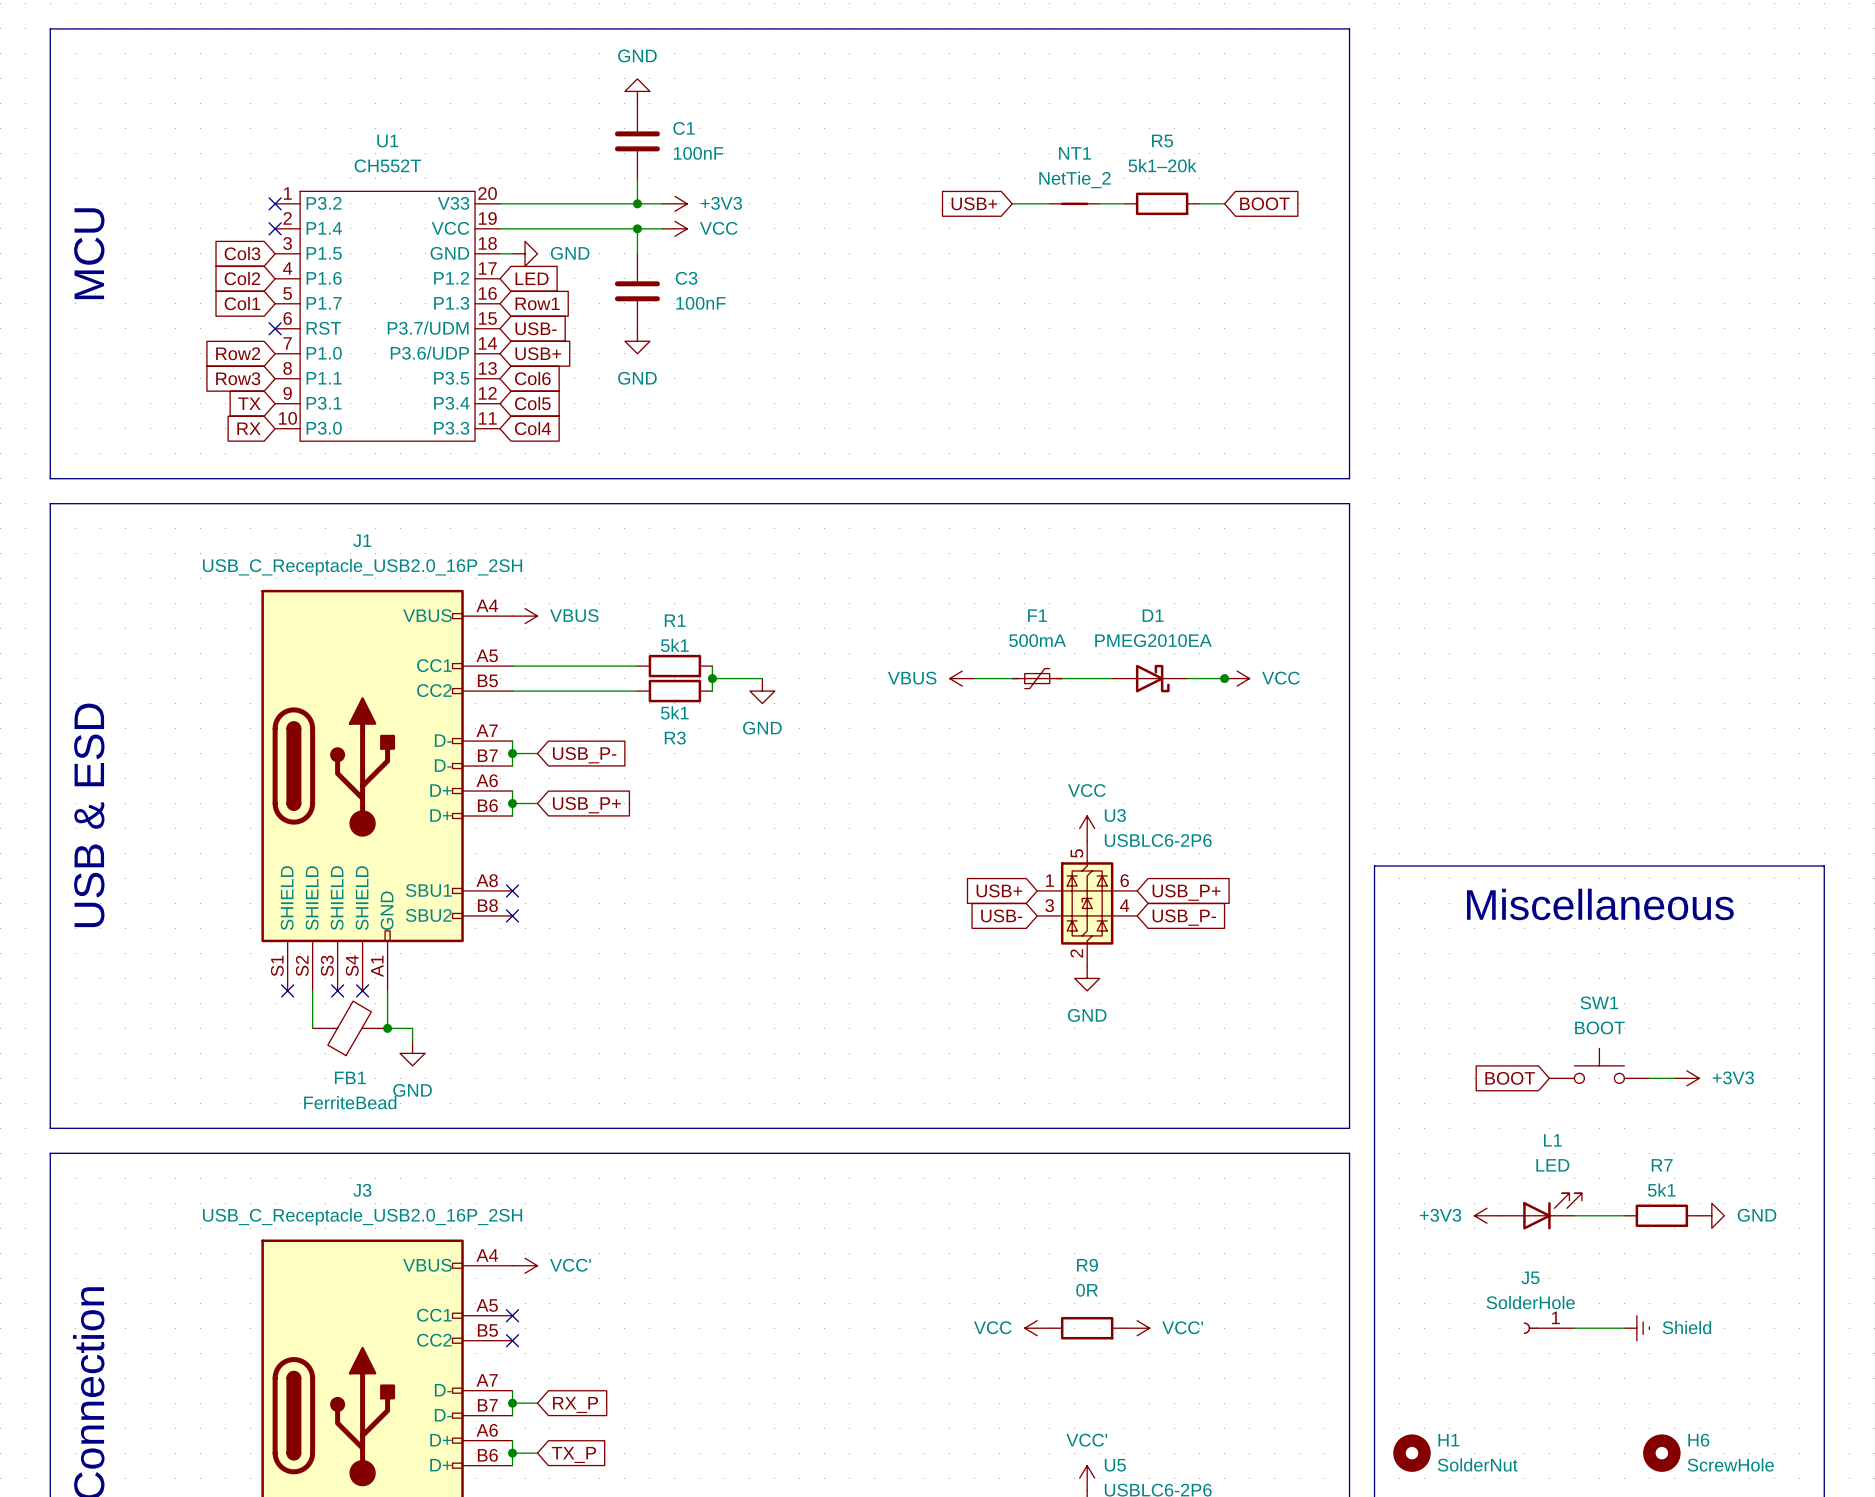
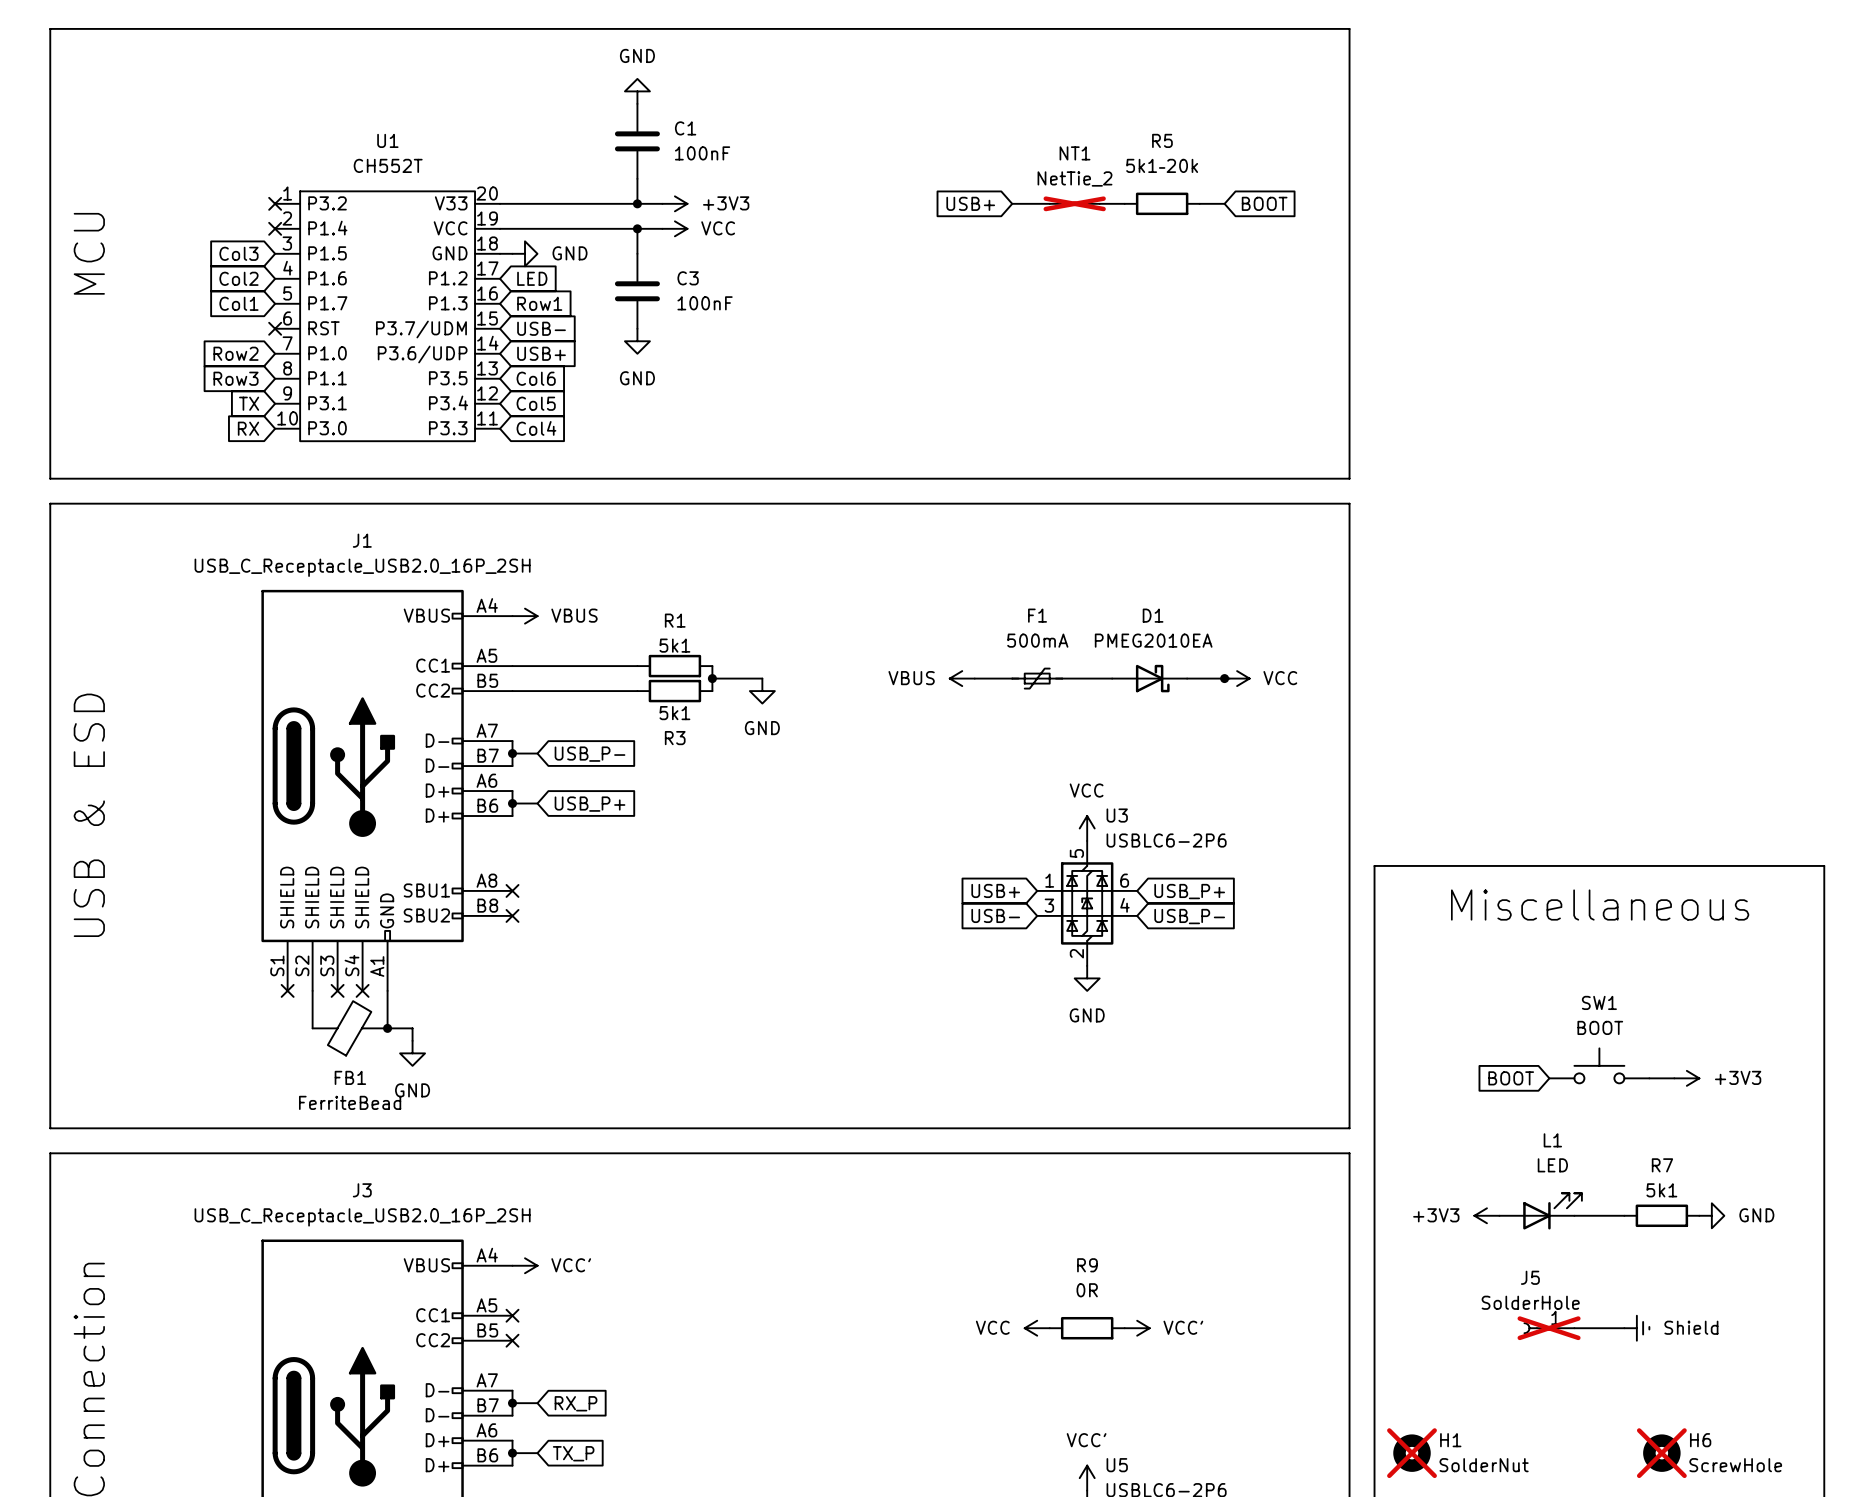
NT1 do-not-place cross: none -> (1074, 203)
J5 do-not-place cross: none -> (1549, 1328)
H1 do-not-place cross: none -> (1412, 1453)
H6 do-not-place cross: none -> (1661, 1453)

